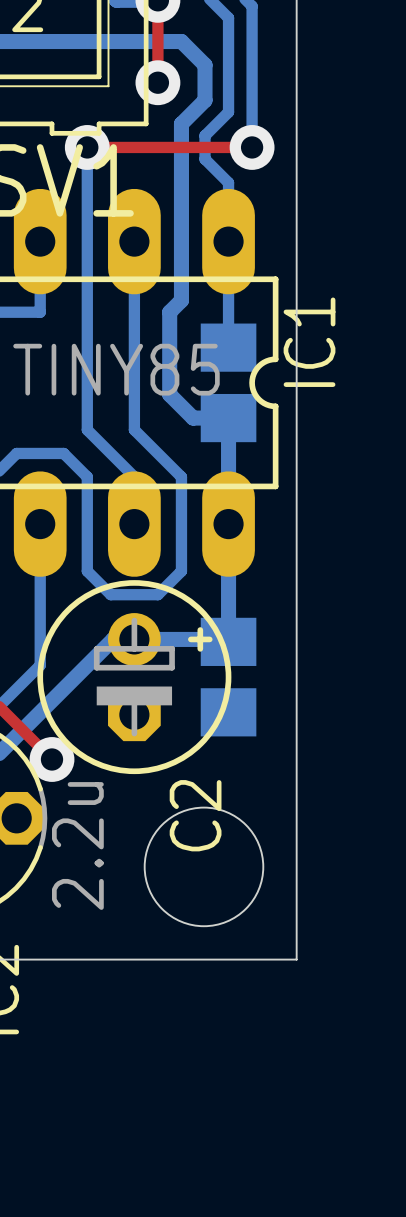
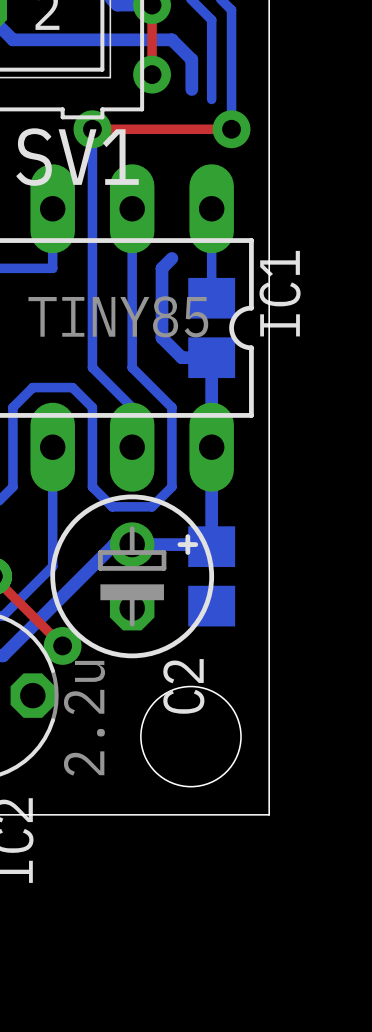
bottom track: (205, 100) (181, 123) (181, 300) -> none
bottom track: (228, 112) (205, 135) (205, 159) (228, 182) (228, 241) -> none

